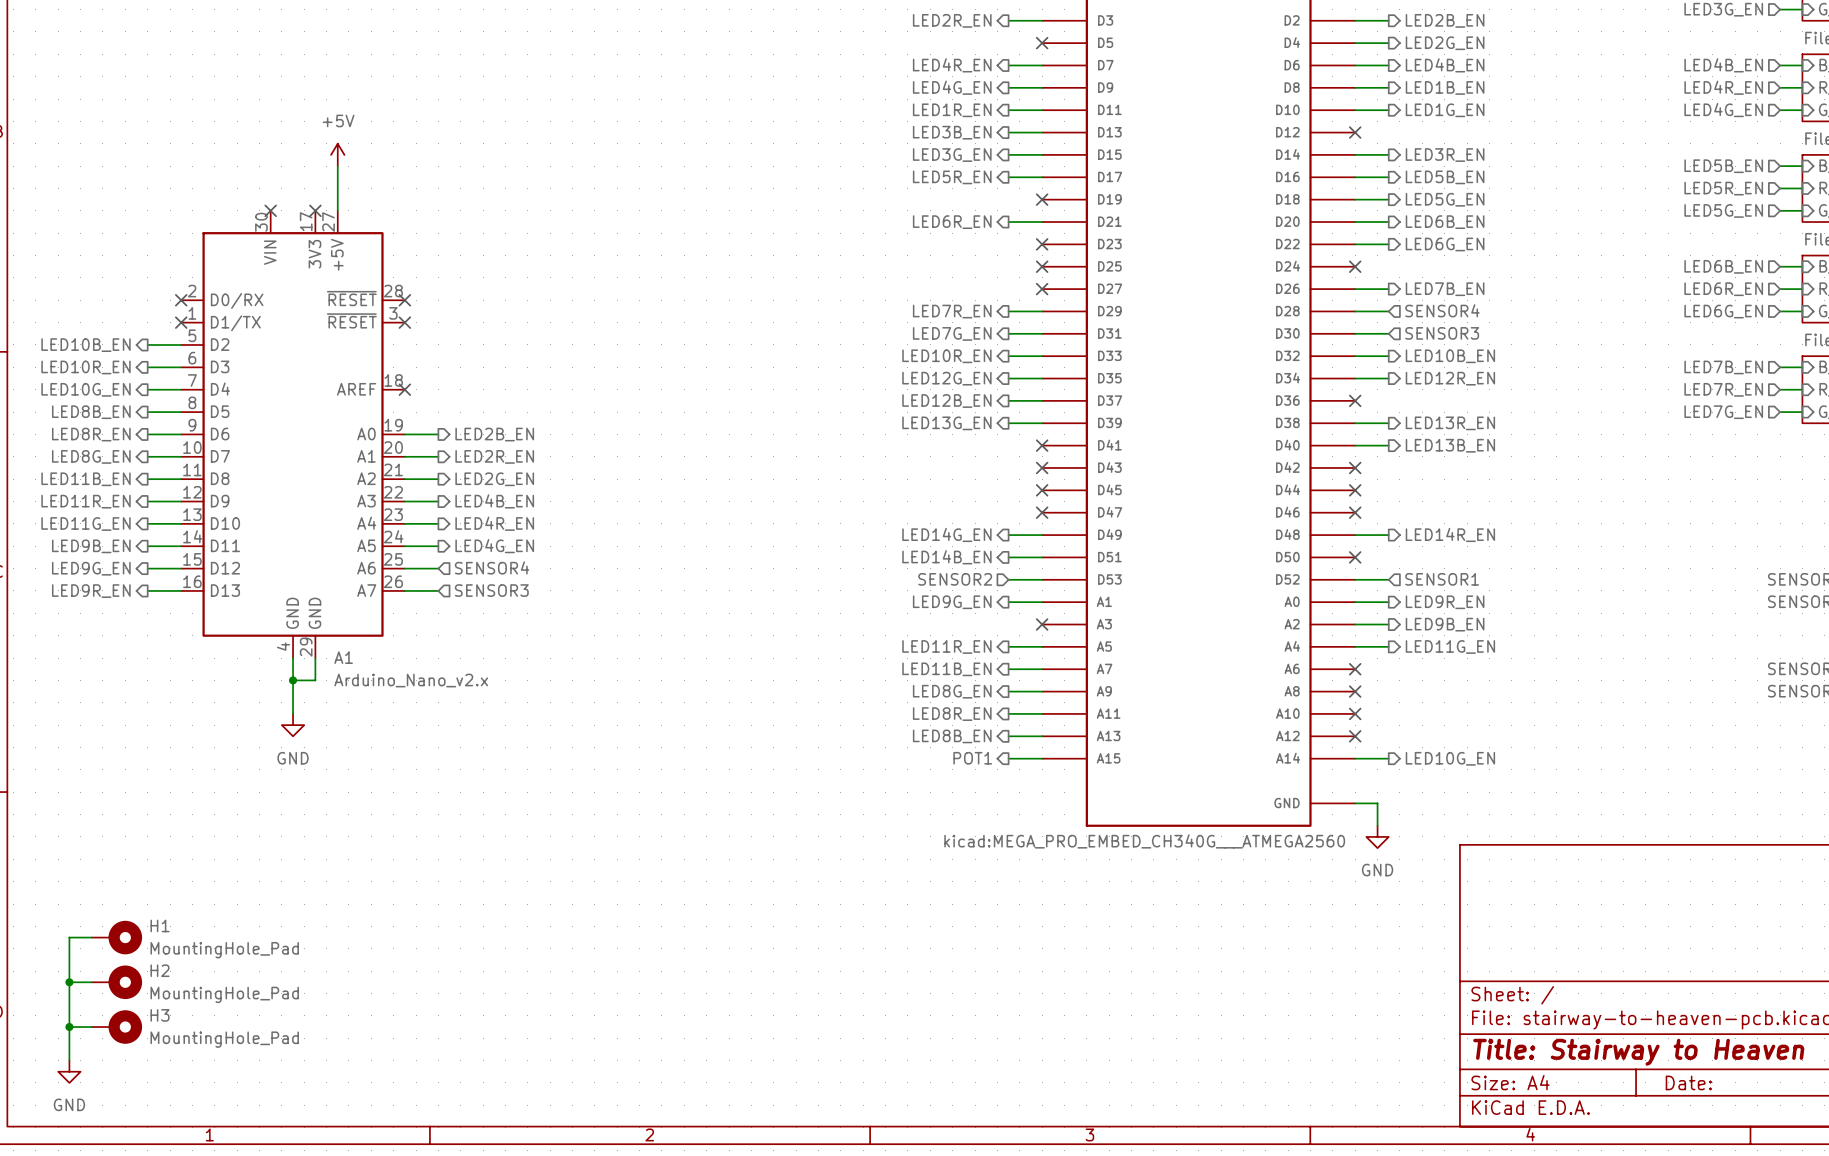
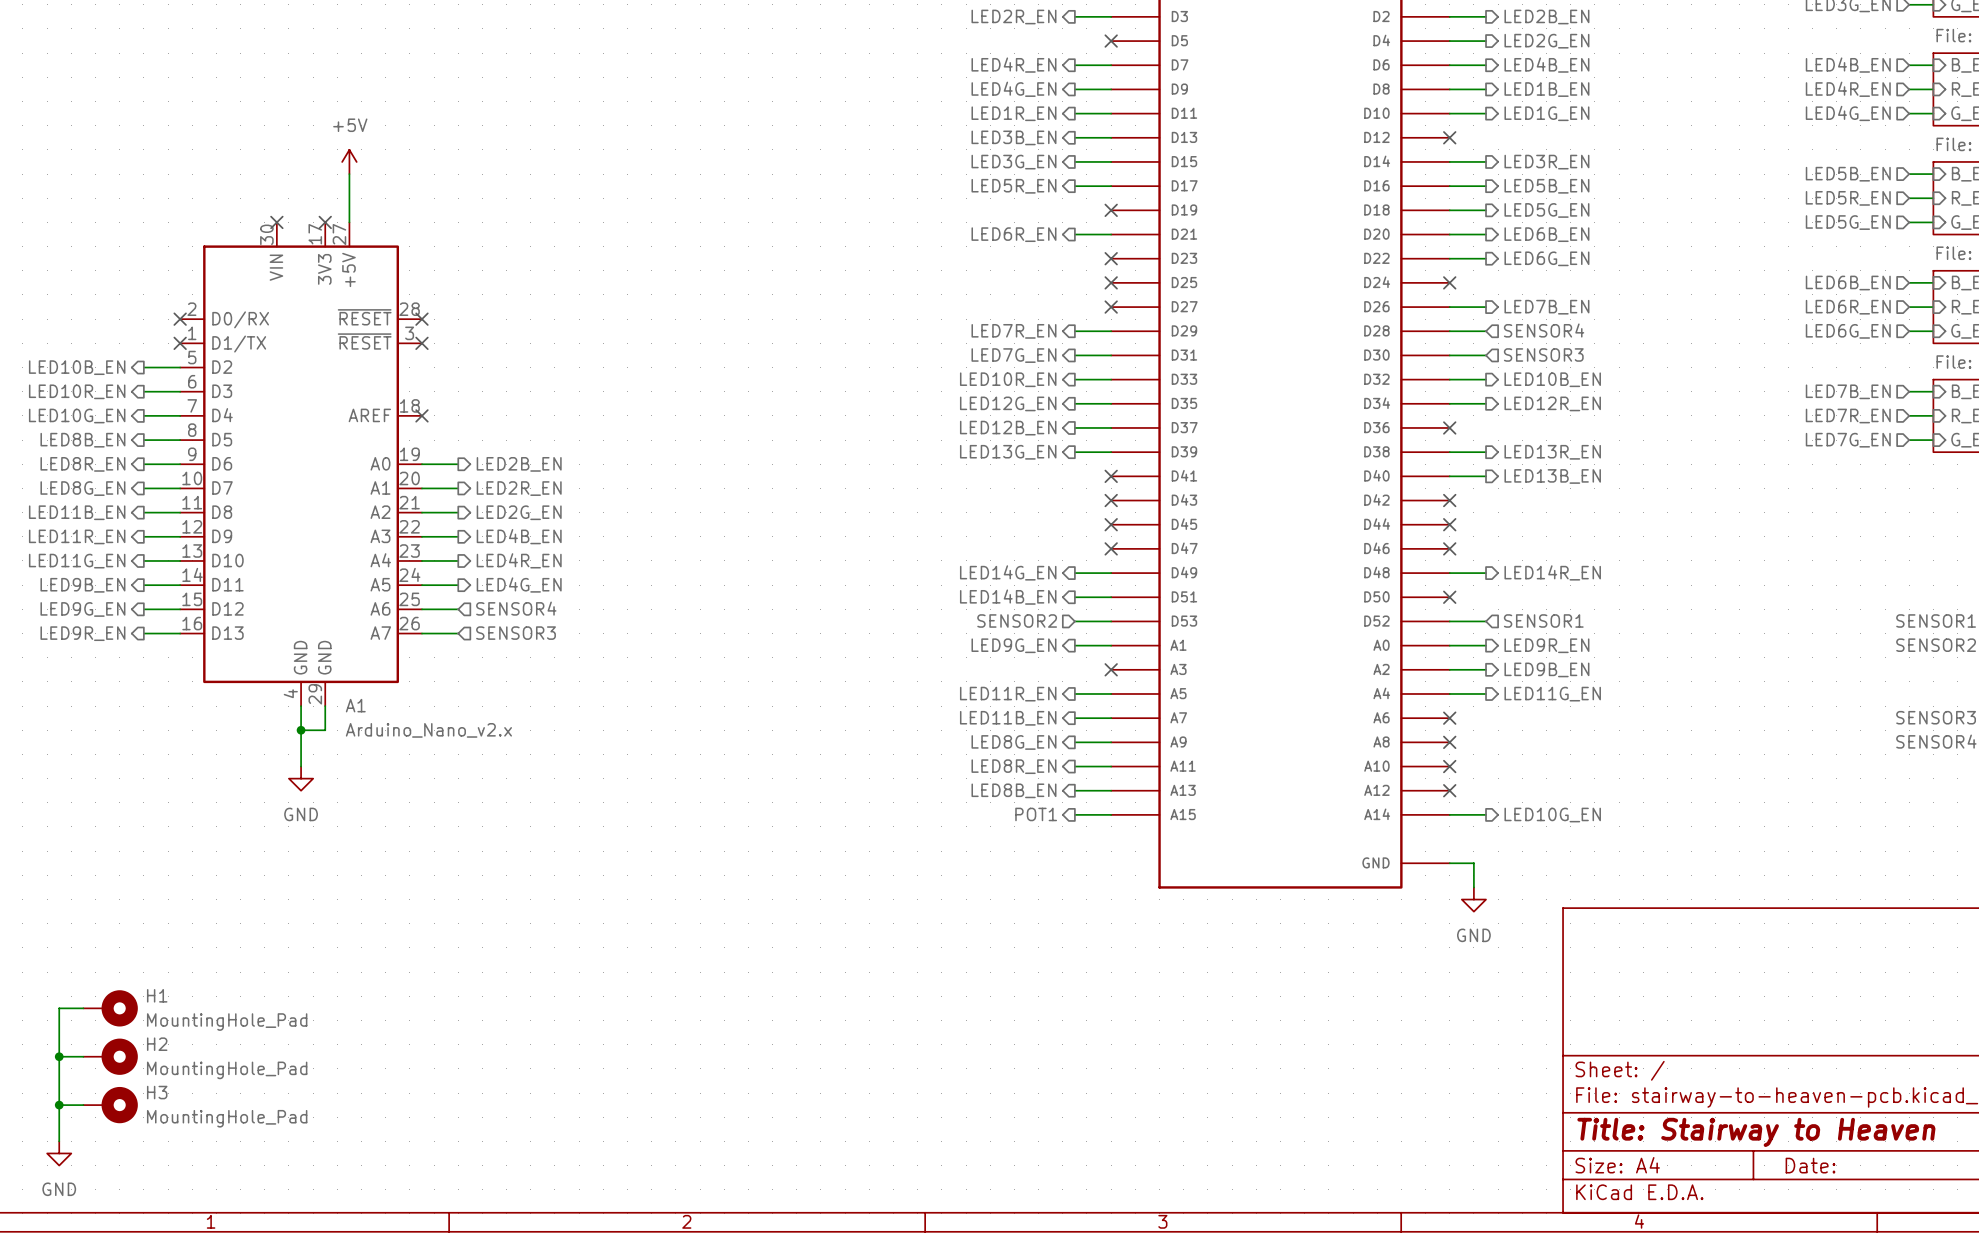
part text: kicad:MEGA_PRO_EMBED_CH340G___ATMEGA2560 (1144, 841) -> none

